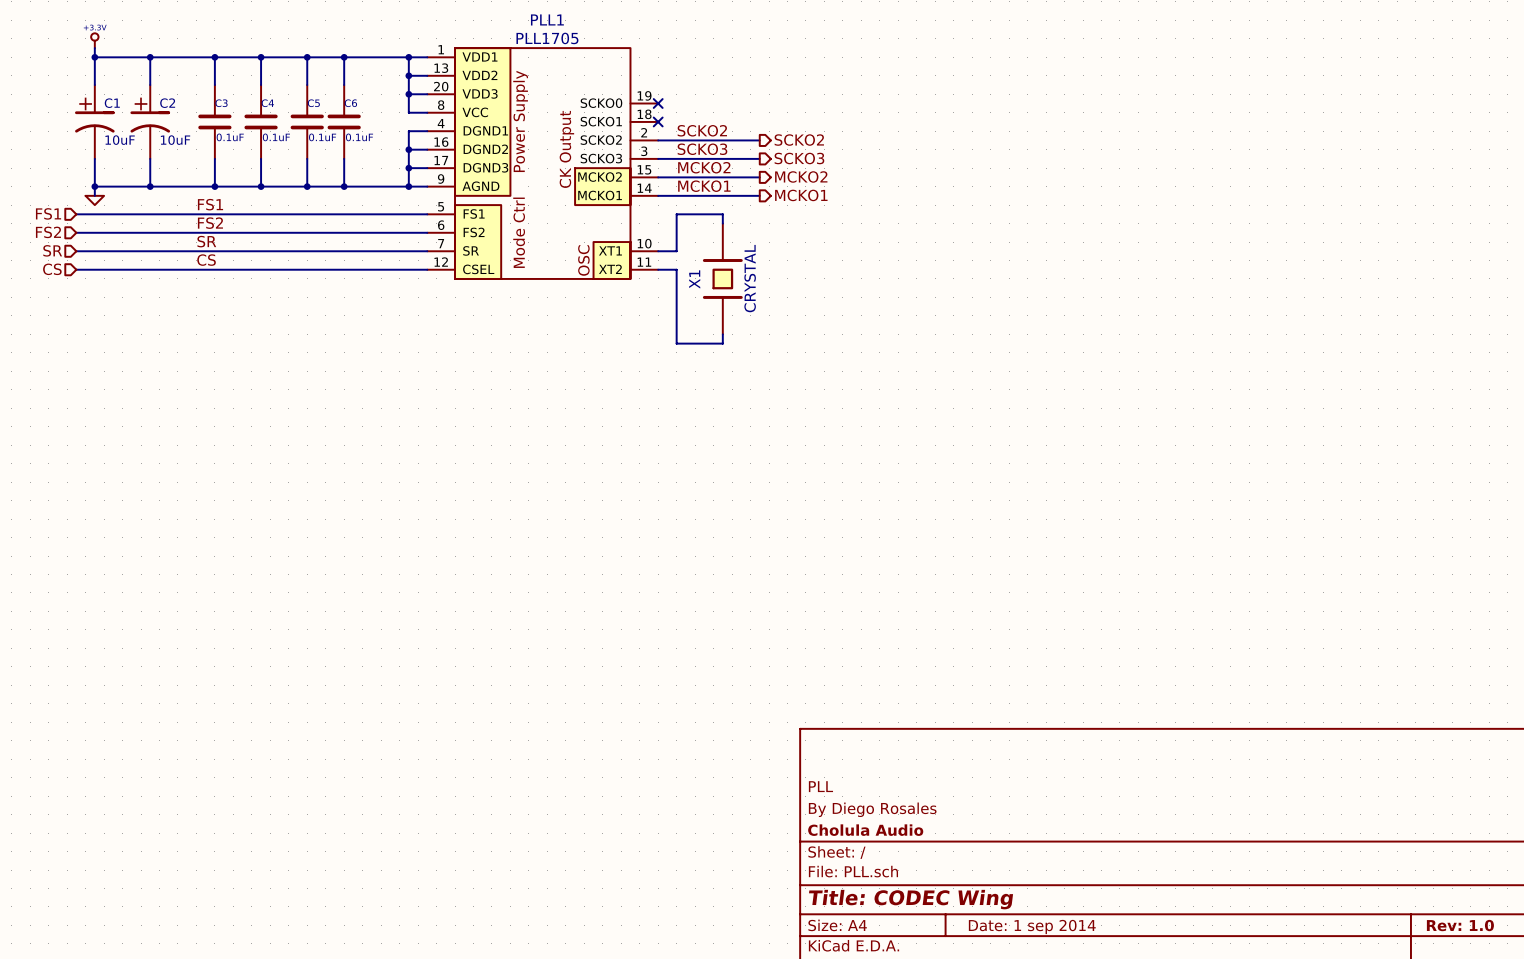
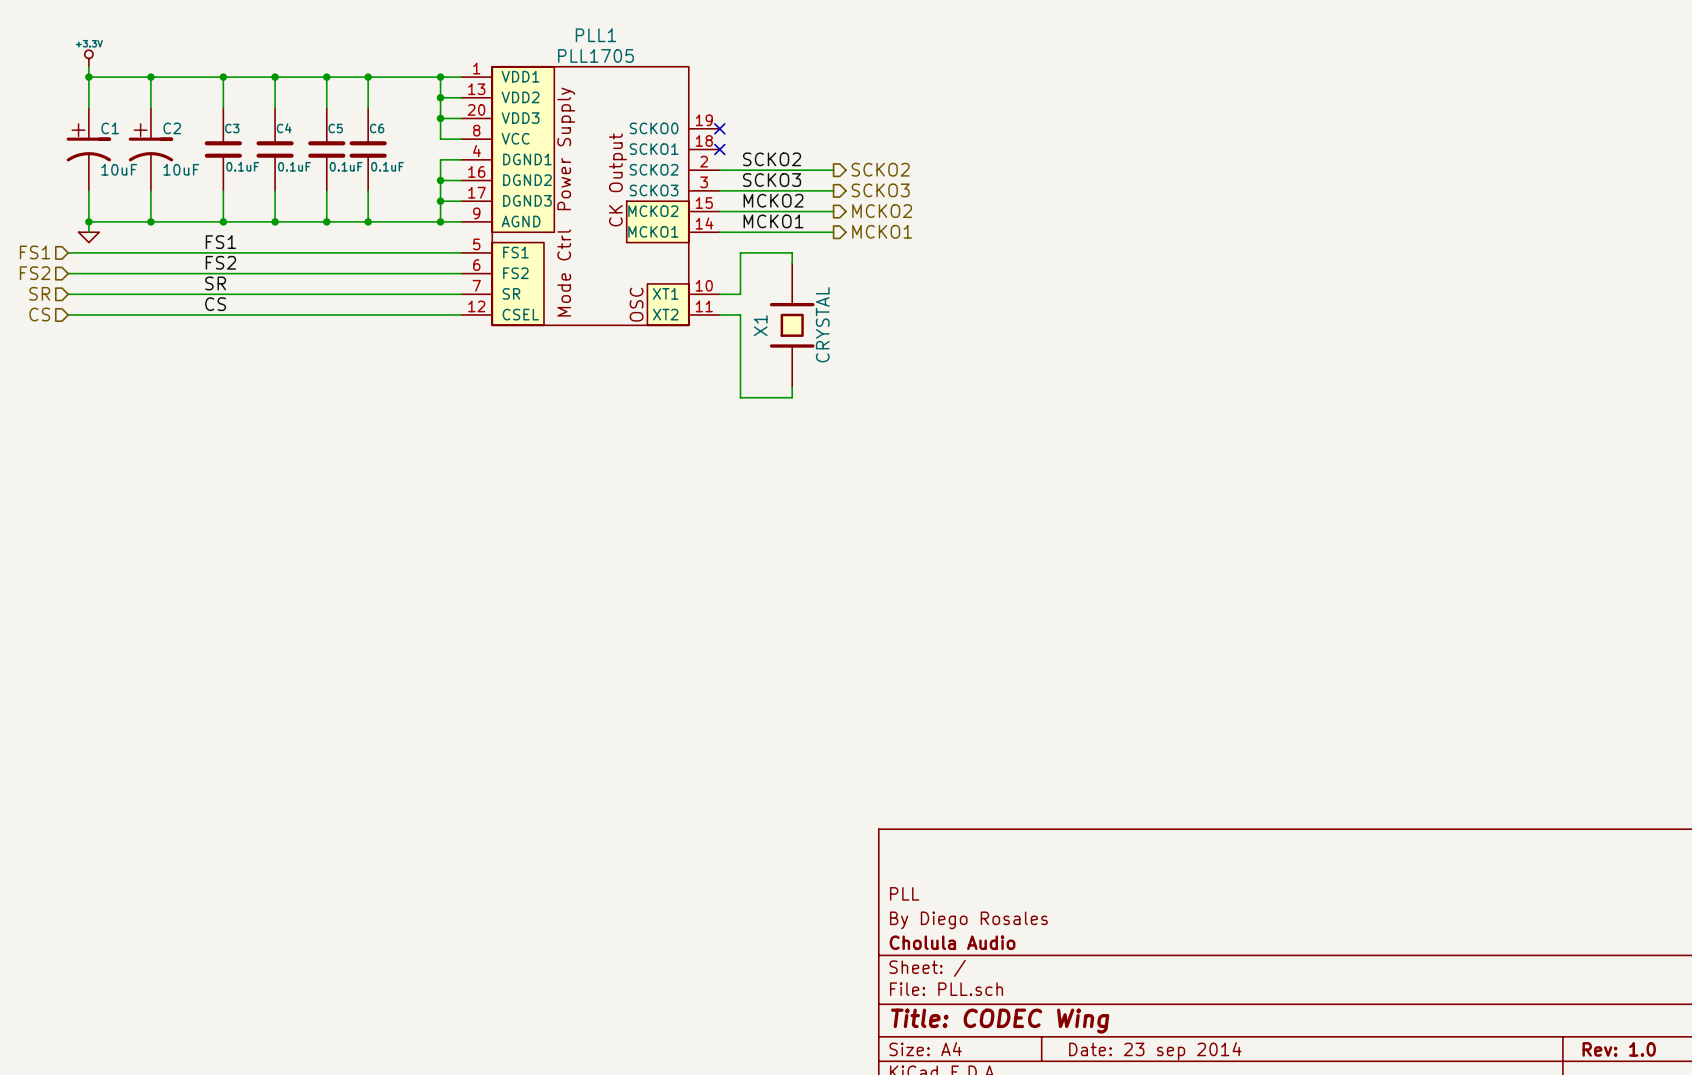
title block: Date: 1 sep 2014 (1032, 926) -> Date: 23 sep 2014 (1155, 1051)

